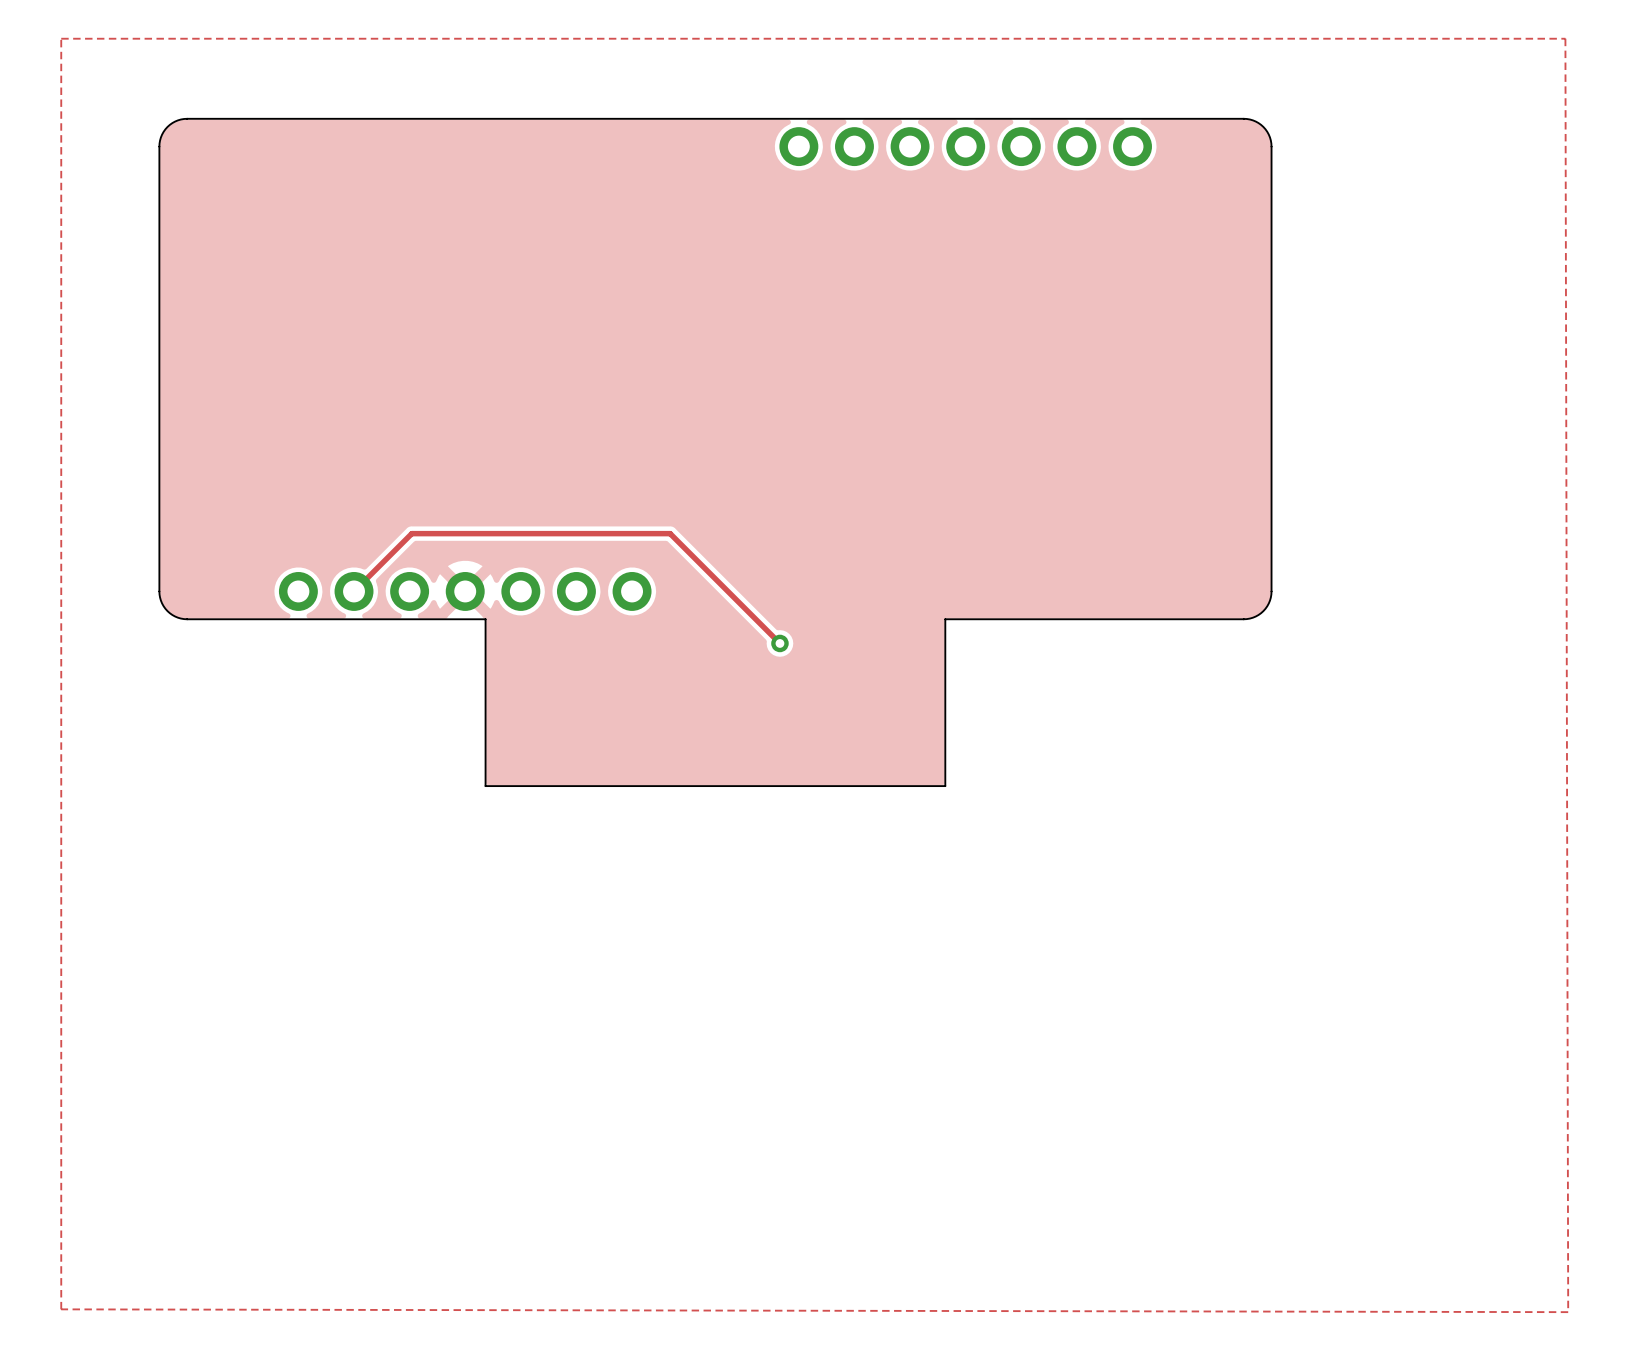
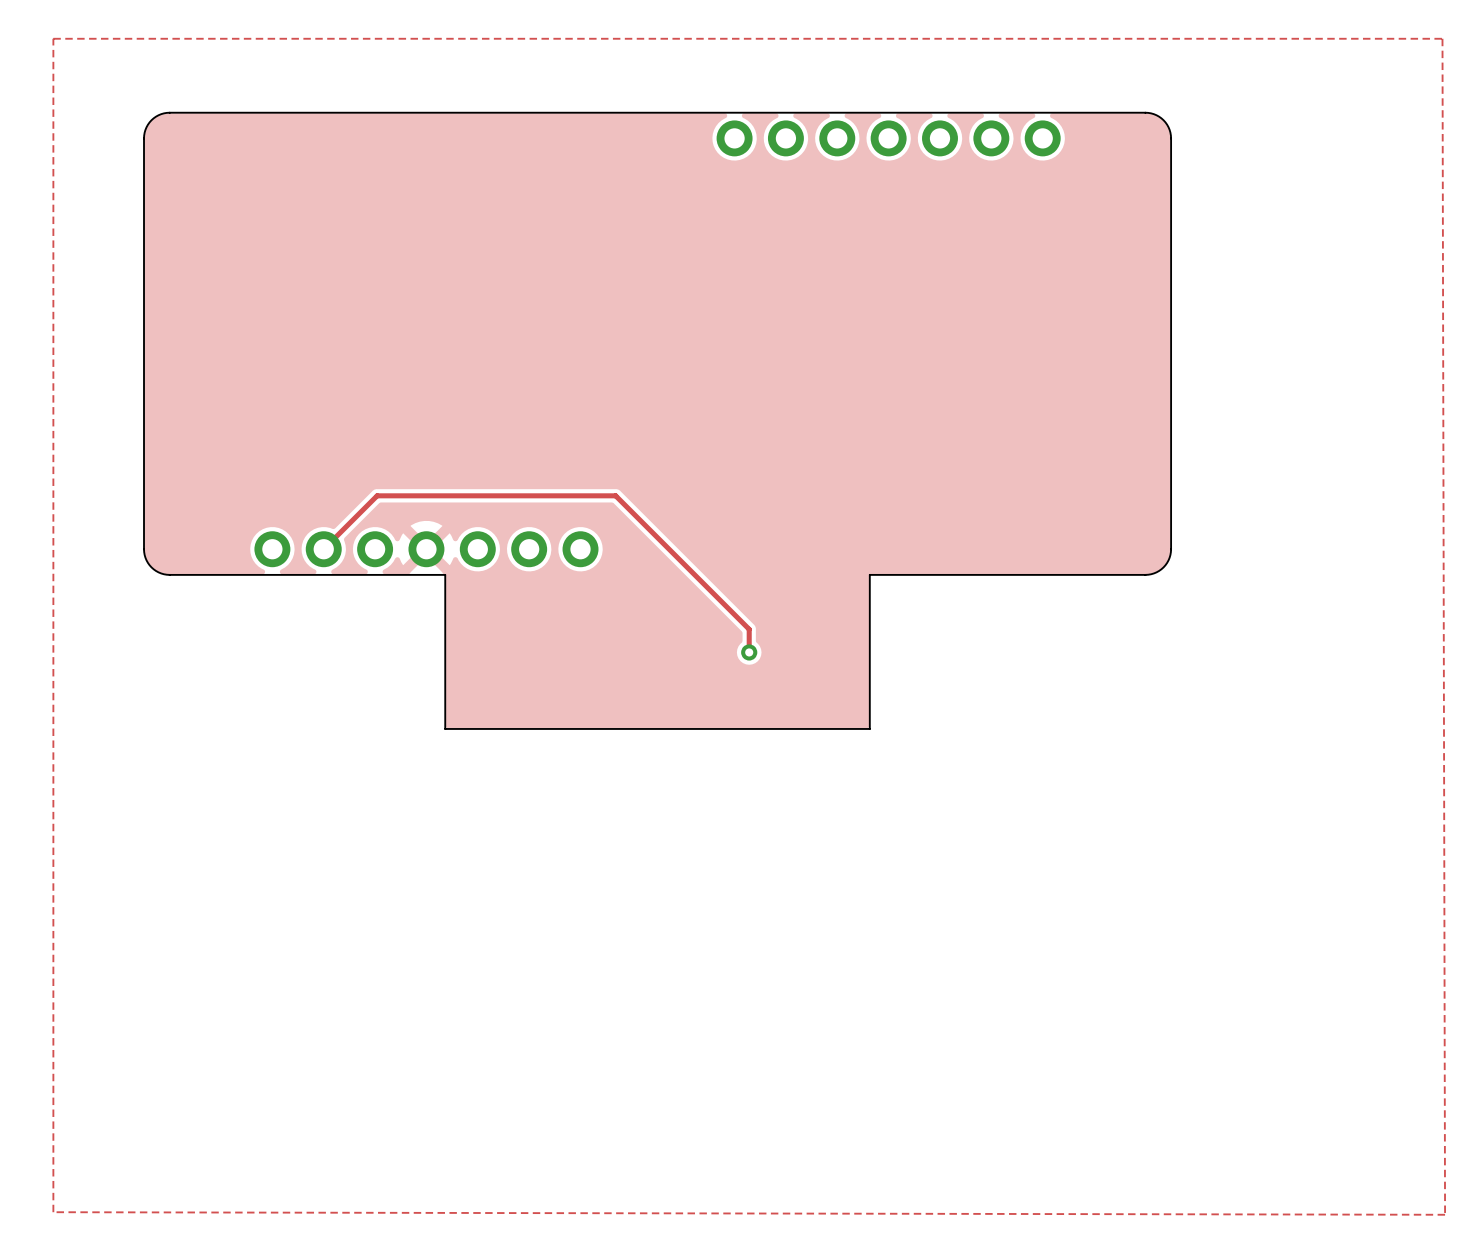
track: none -> (717, 597) (749, 629) (749, 652)
via position: (779, 643) -> (749, 652)

